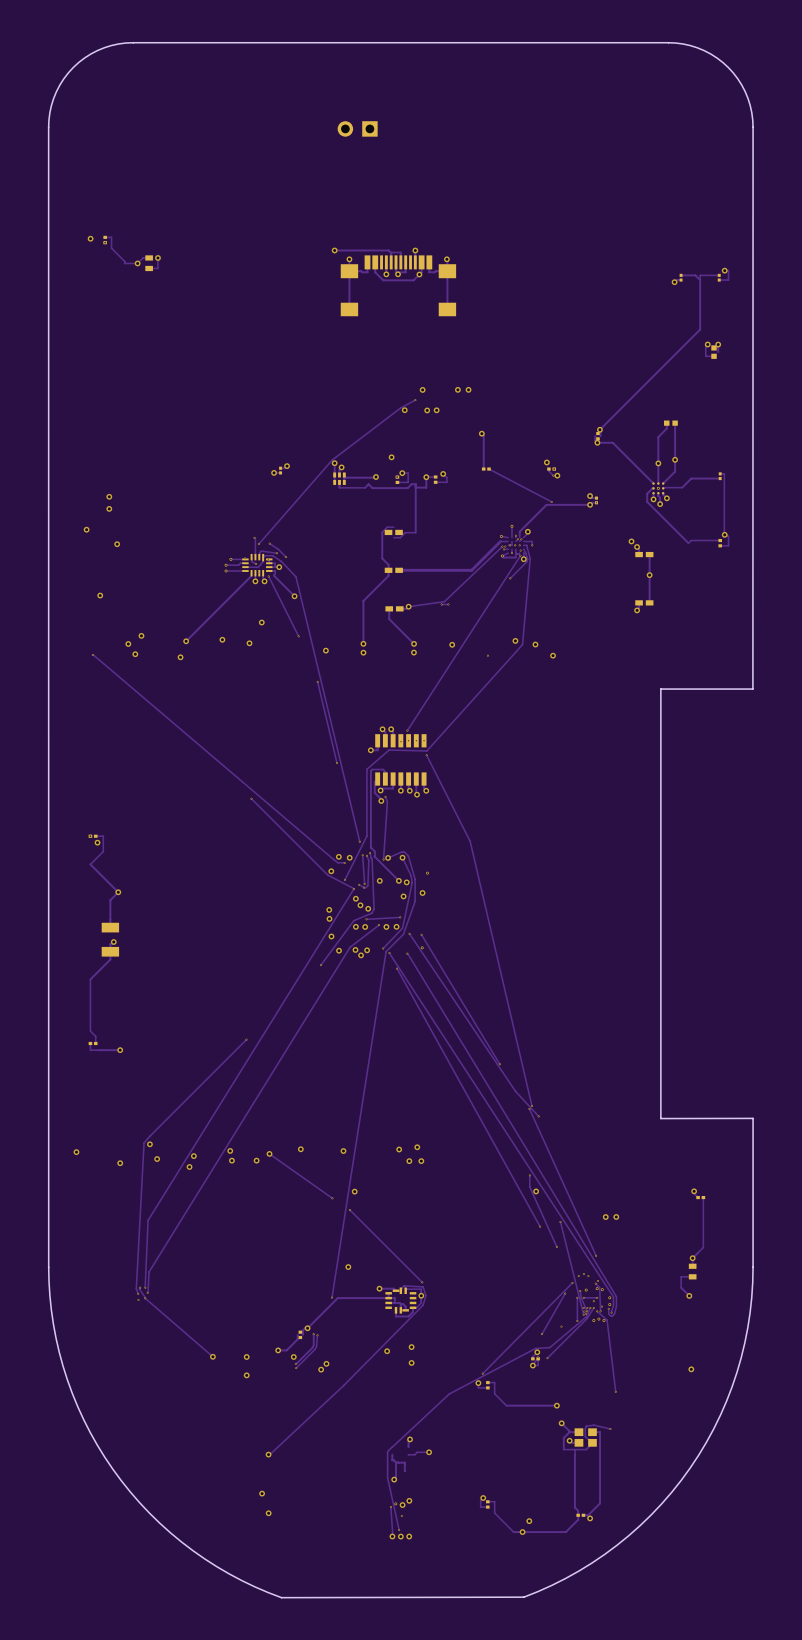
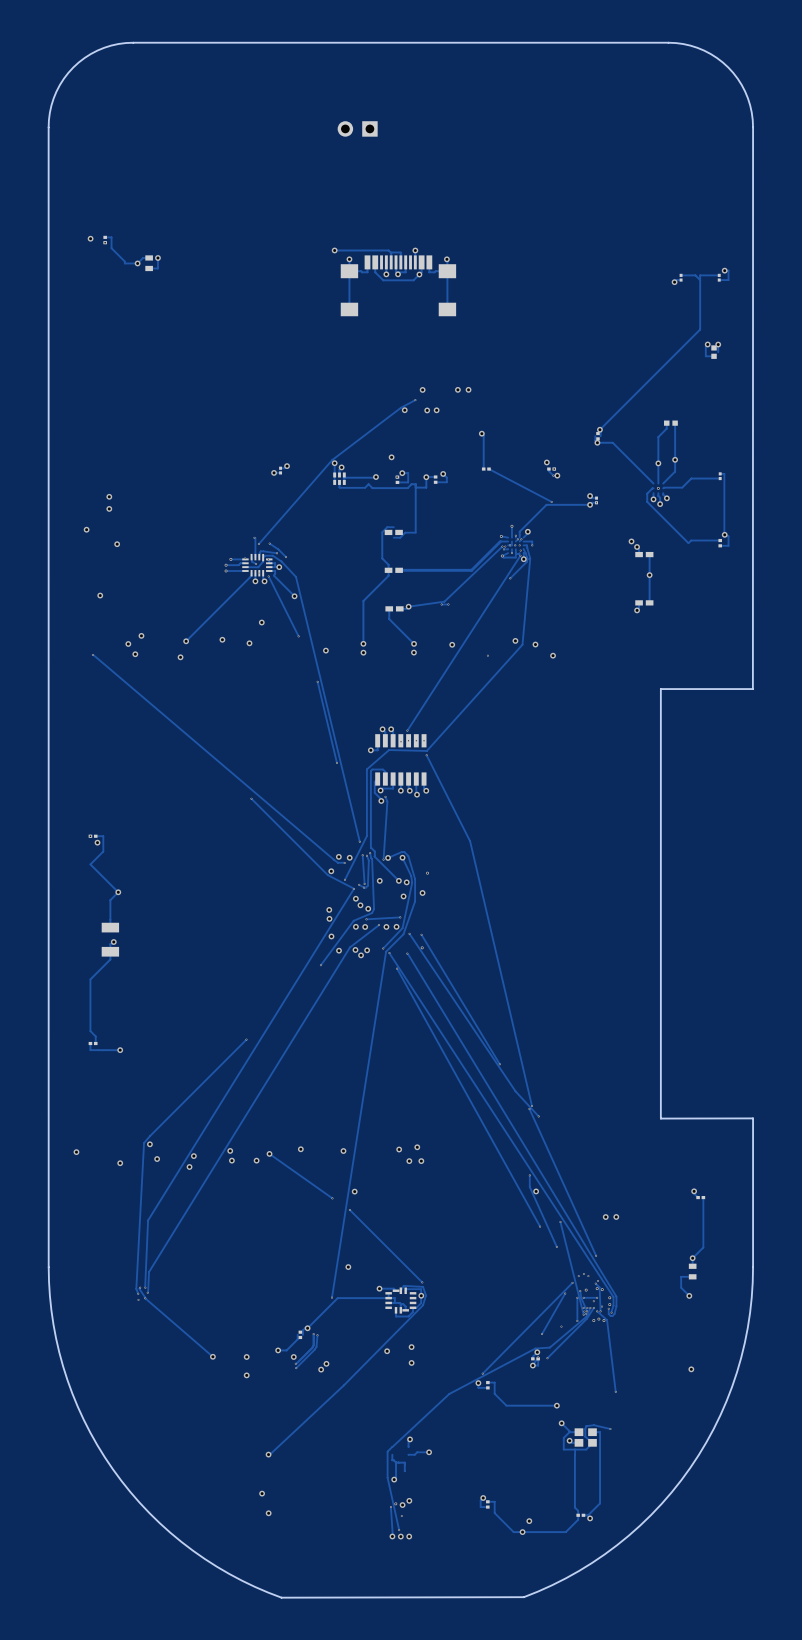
part: (658, 488) -> none

